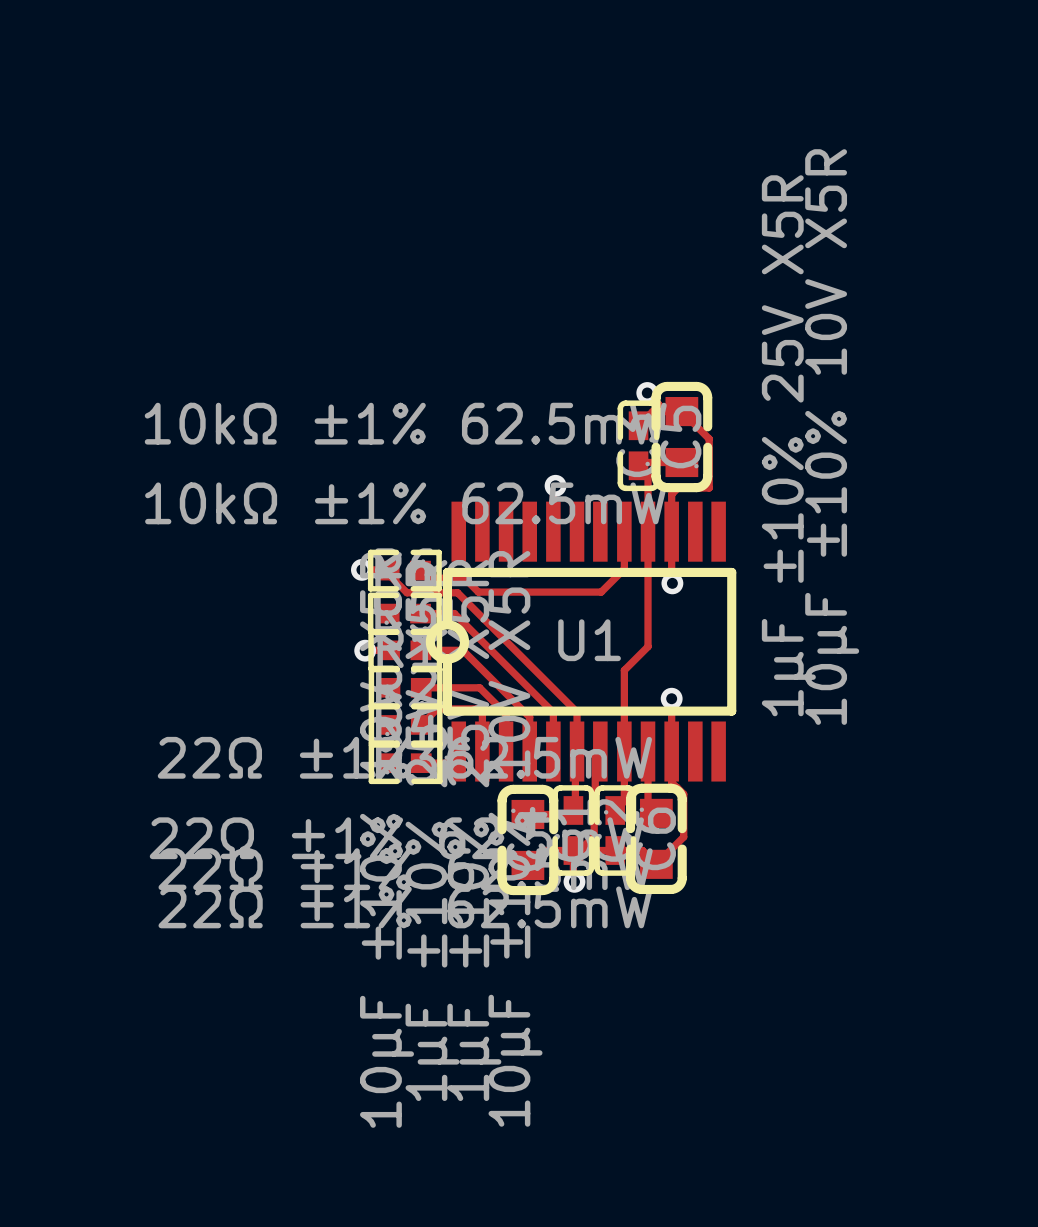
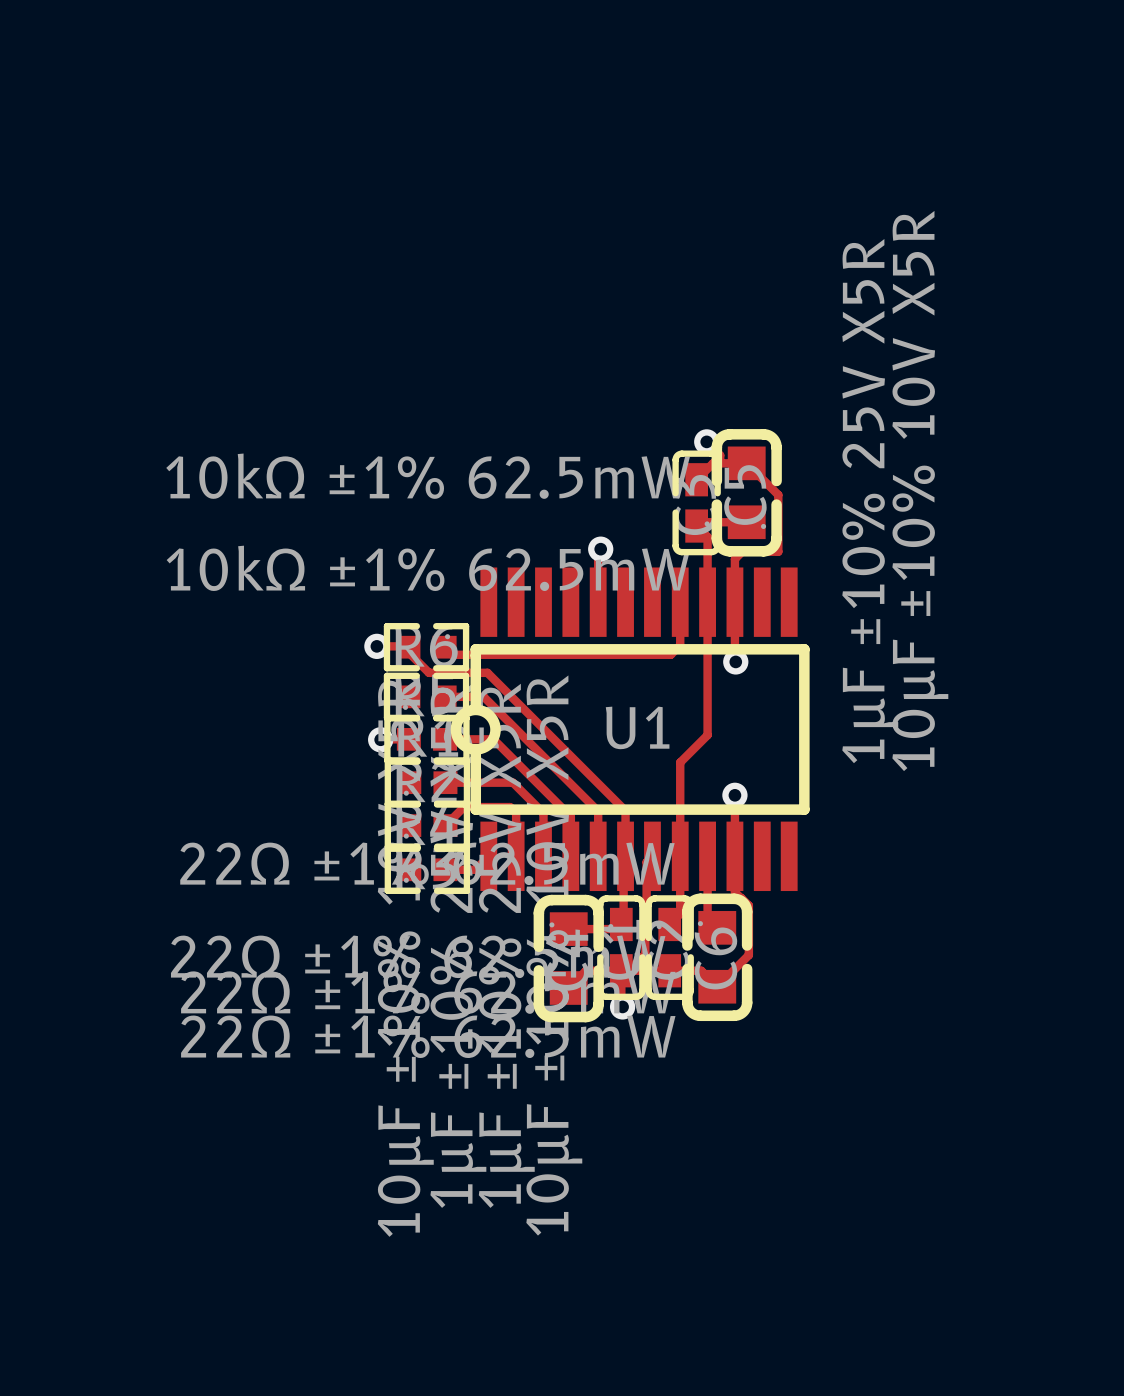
track: (427, 577) (464, 578) (478, 592) (601, 592) (616, 577) -> (452, 654) (670, 654)

